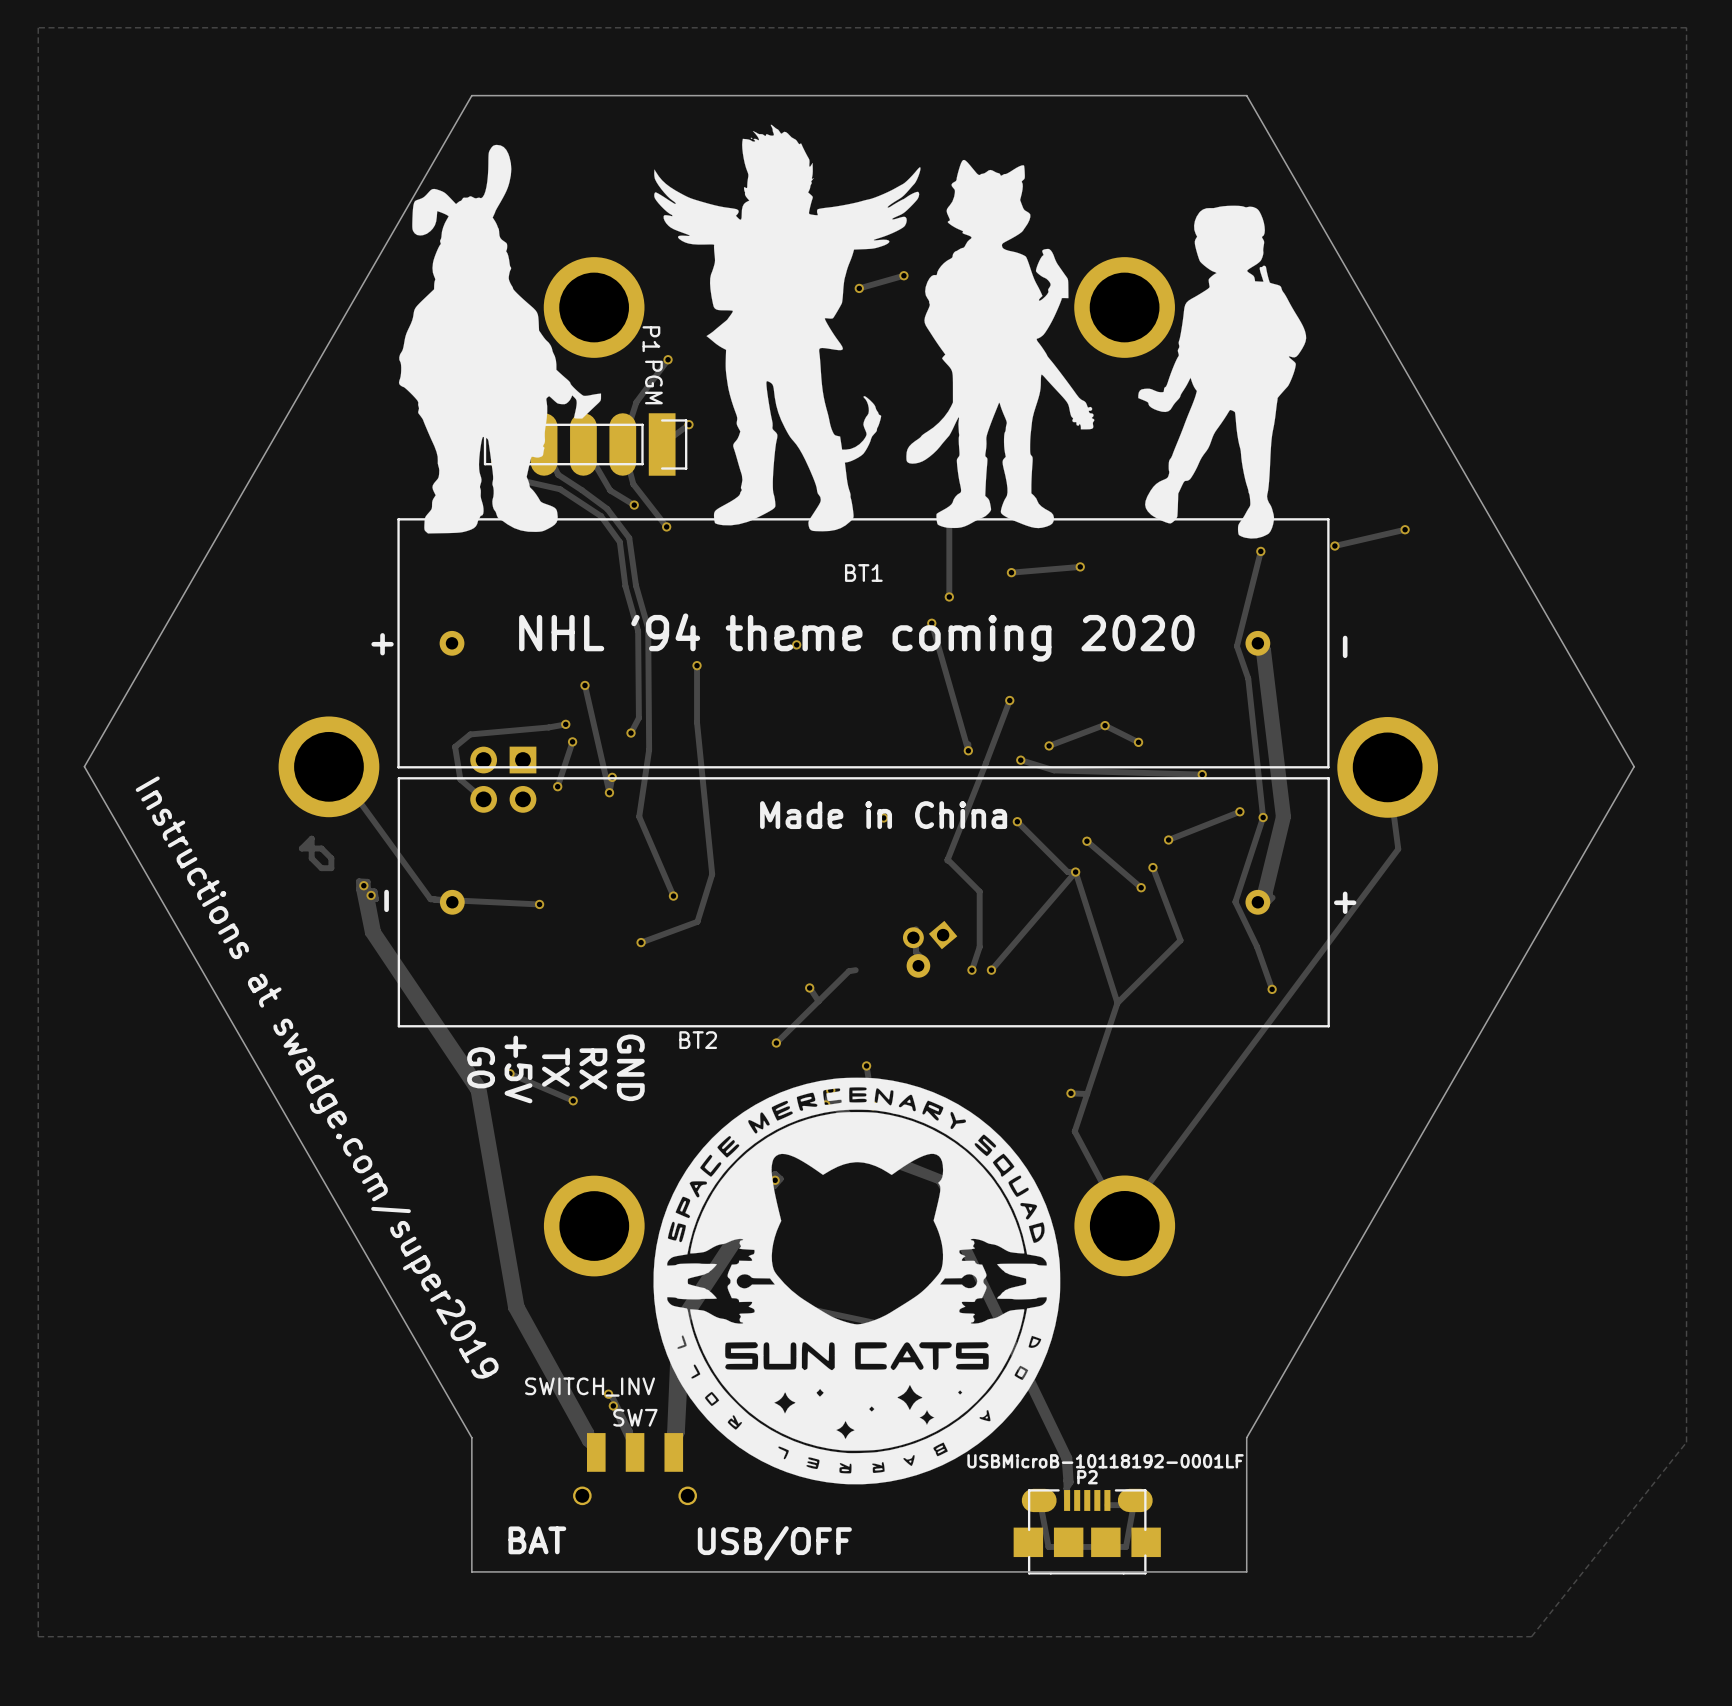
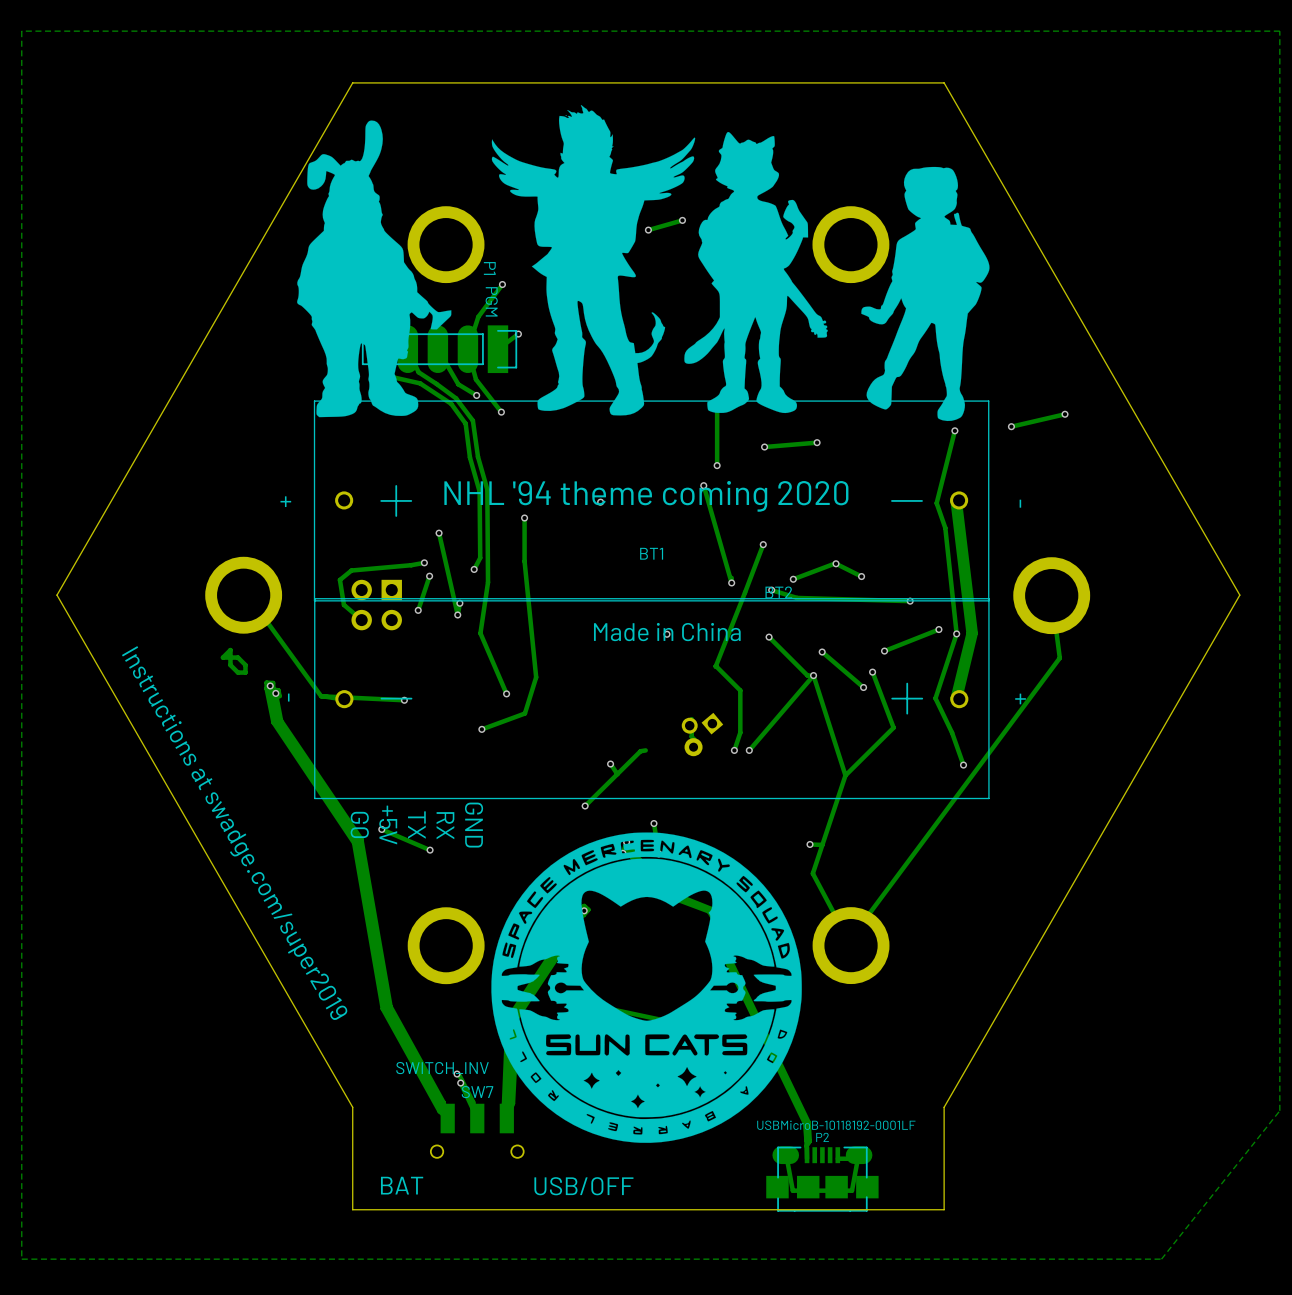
BT1 footprint: [397, 518, 1330, 769] -> [313, 400, 990, 602]
BT1 name position: BT1 (863, 573) -> BT1 (651, 553)
BT2 footprint: [397, 777, 1330, 1028] -> [314, 598, 990, 800]
BT2 name position: BT2 (698, 1040) -> BT2 (778, 592)

